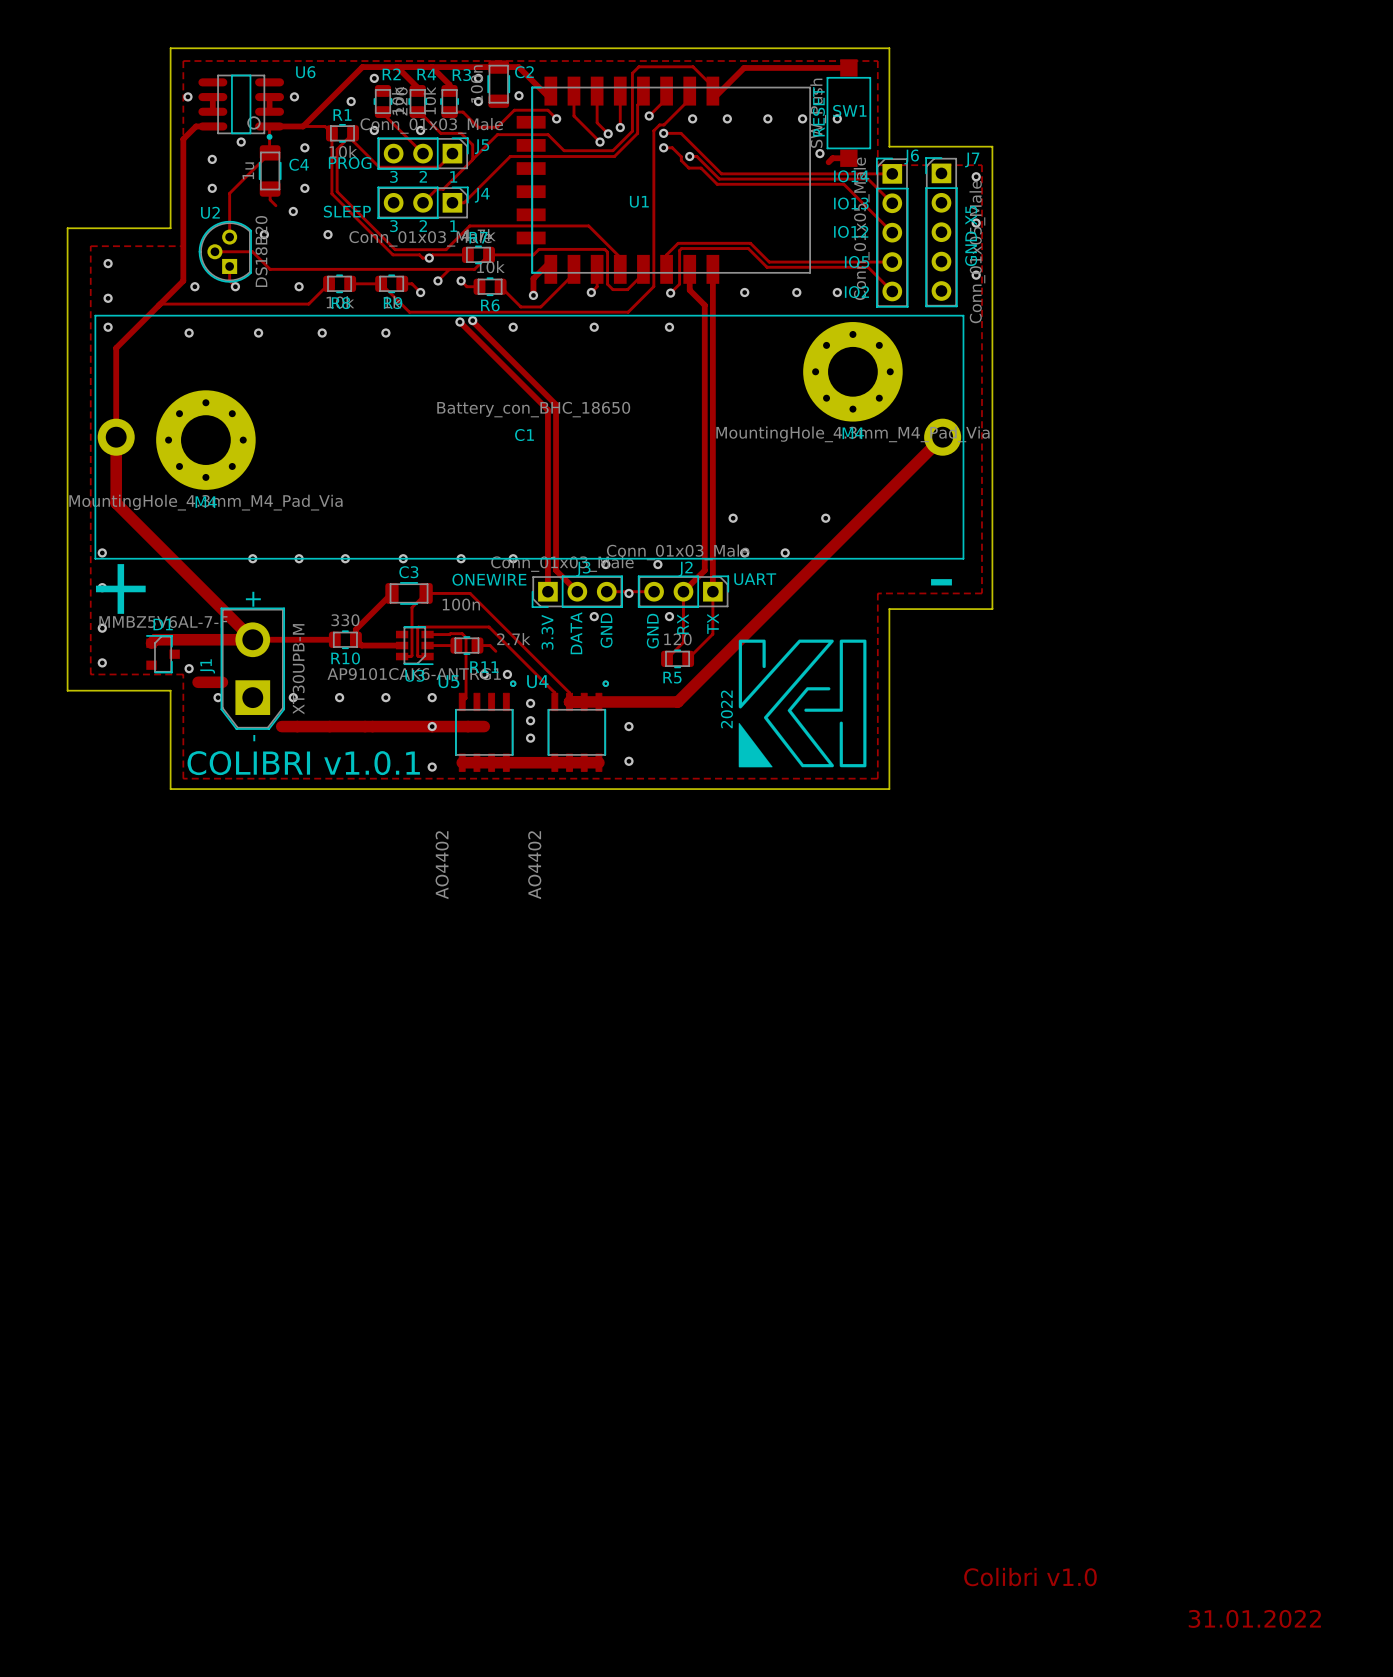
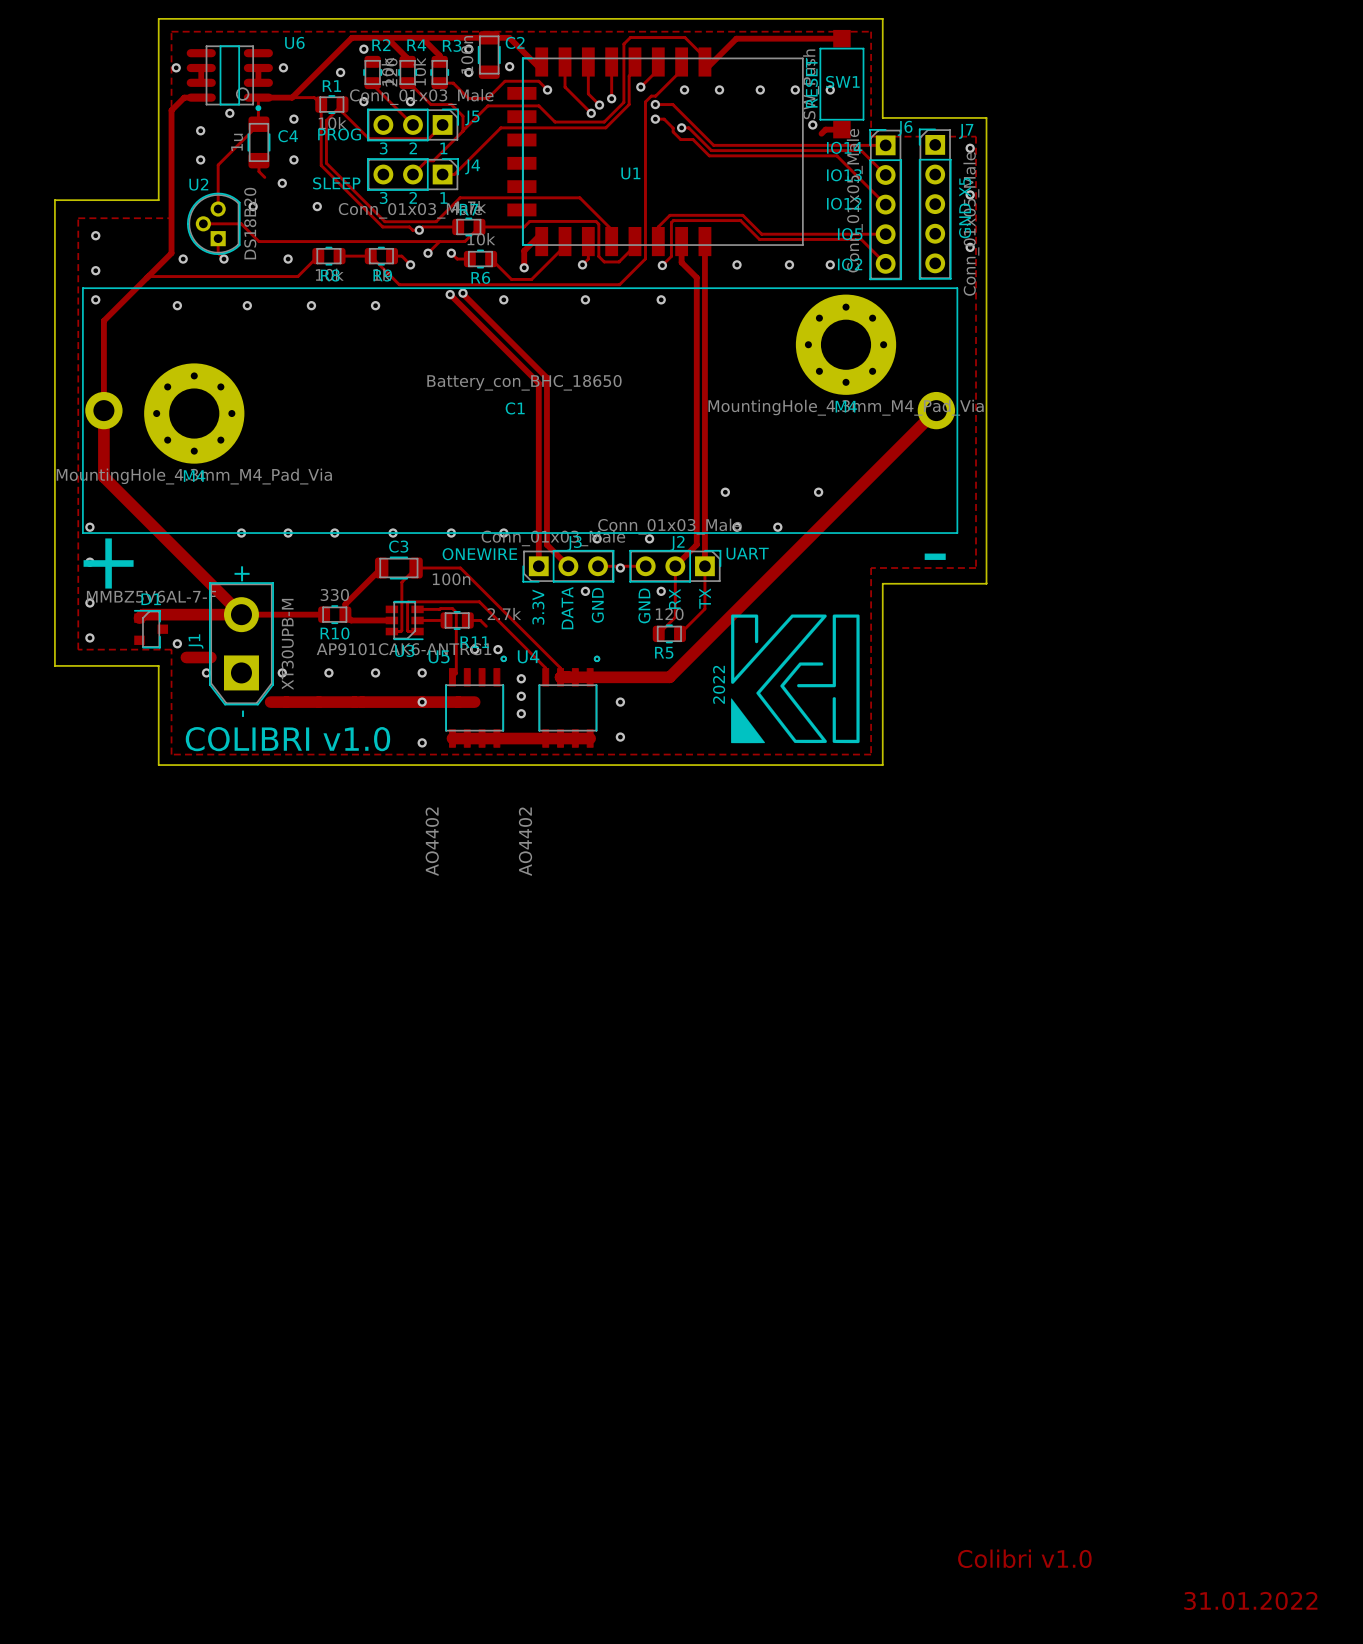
text: COLIBRI v1.0.1 (303, 763) -> COLIBRI v1.0 (287, 739)

